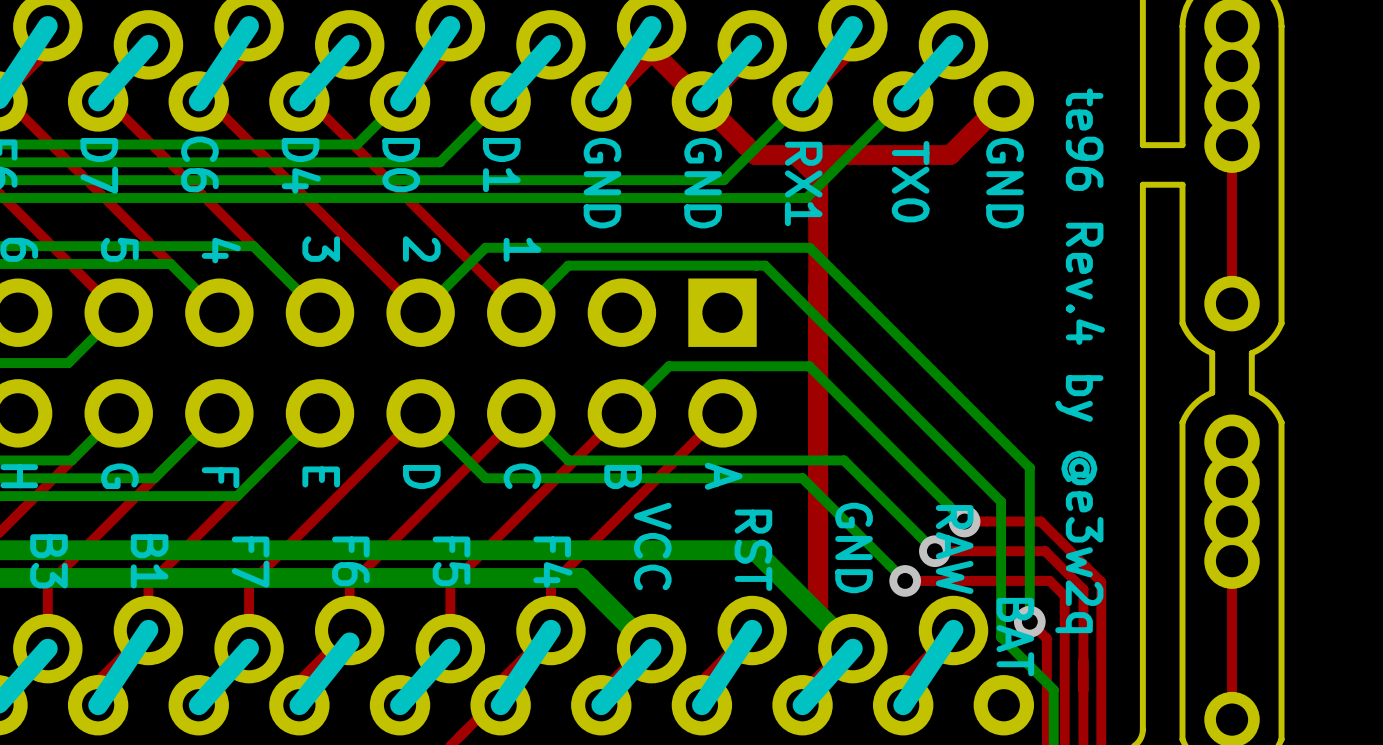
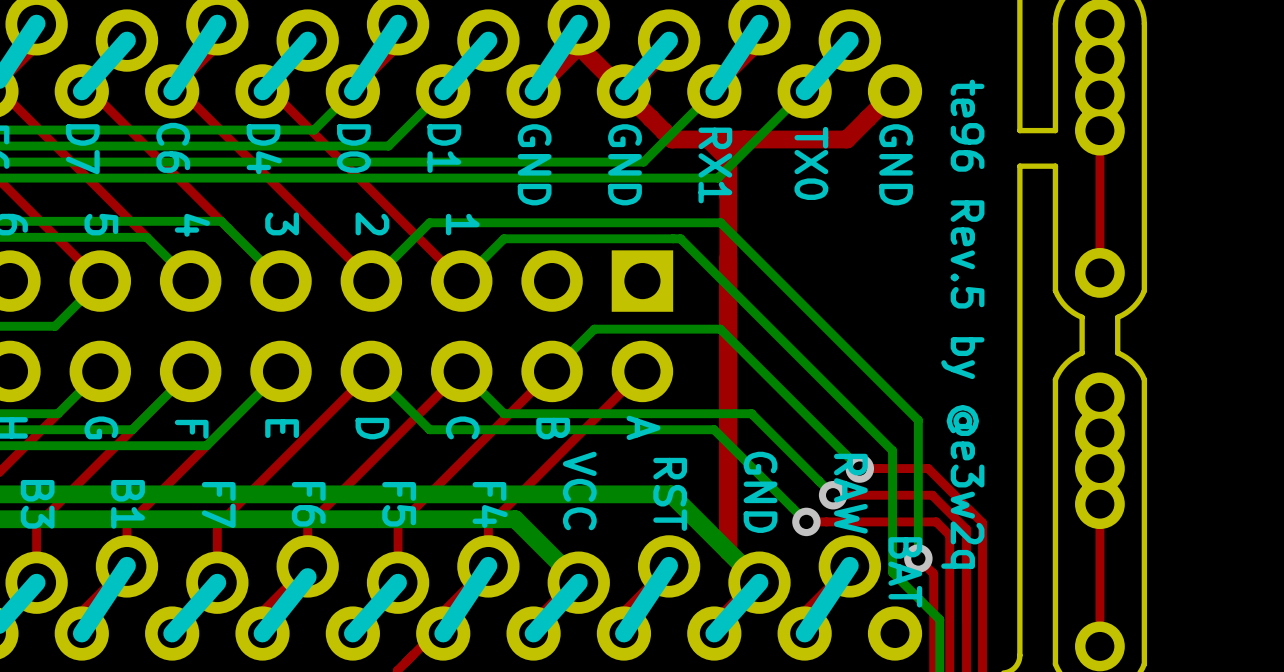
text: te96 Rev.4 by @e3w2q (1080, 360) -> te96 Rev.5 by @e3w2q (962, 324)

